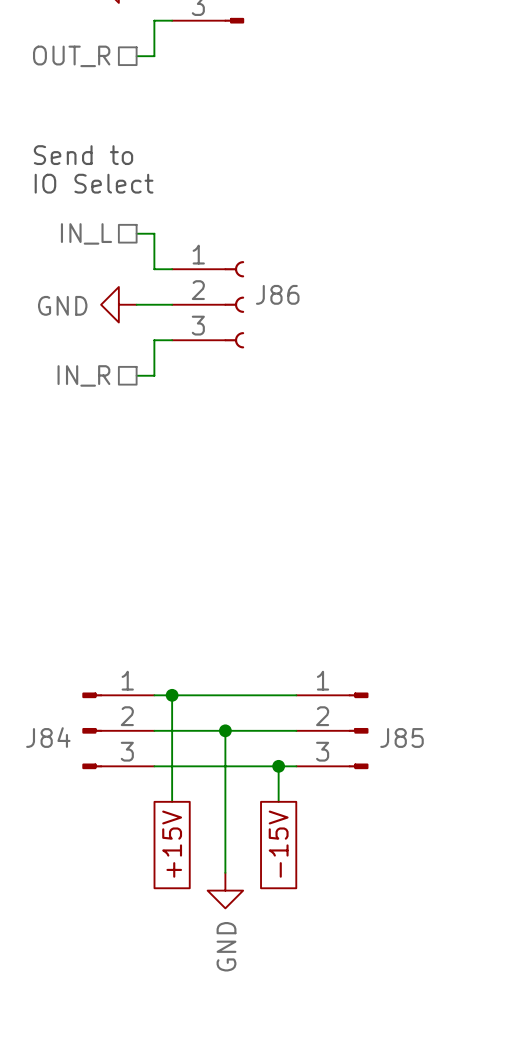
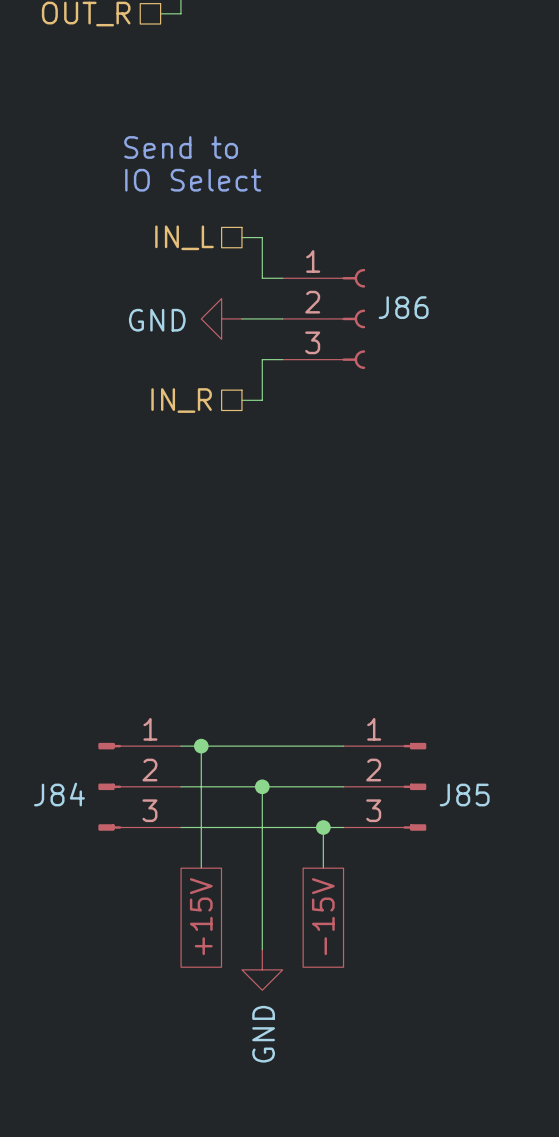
text position: Send to (83, 155) -> Send to (181, 147)
text position: IO Select (94, 183) -> IO Select (193, 180)
hierarchical label position: IN_L (86, 233) -> IN_L (184, 237)
wire: (136, 233) (154, 233) (154, 269) (172, 269) -> (241, 237) (262, 237) (262, 278) (282, 278)
power symbol position: GND (118, 304) -> GND (221, 318)
wire: (136, 304) (172, 304) -> (241, 318) (282, 318)
J86 position: (208, 304) -> (323, 318)
wire: (172, 340) (154, 340) (154, 375) (136, 375) -> (282, 359) (262, 359) (262, 400) (241, 400)
hierarchical label position: IN_R (83, 375) -> IN_R (181, 400)

